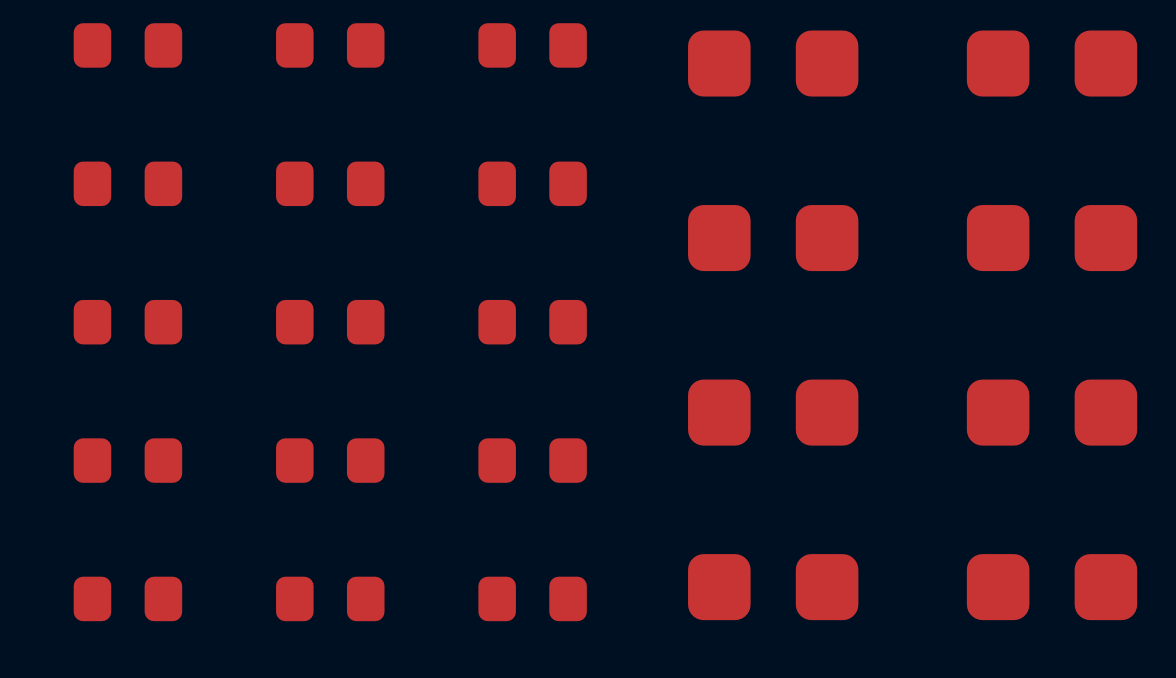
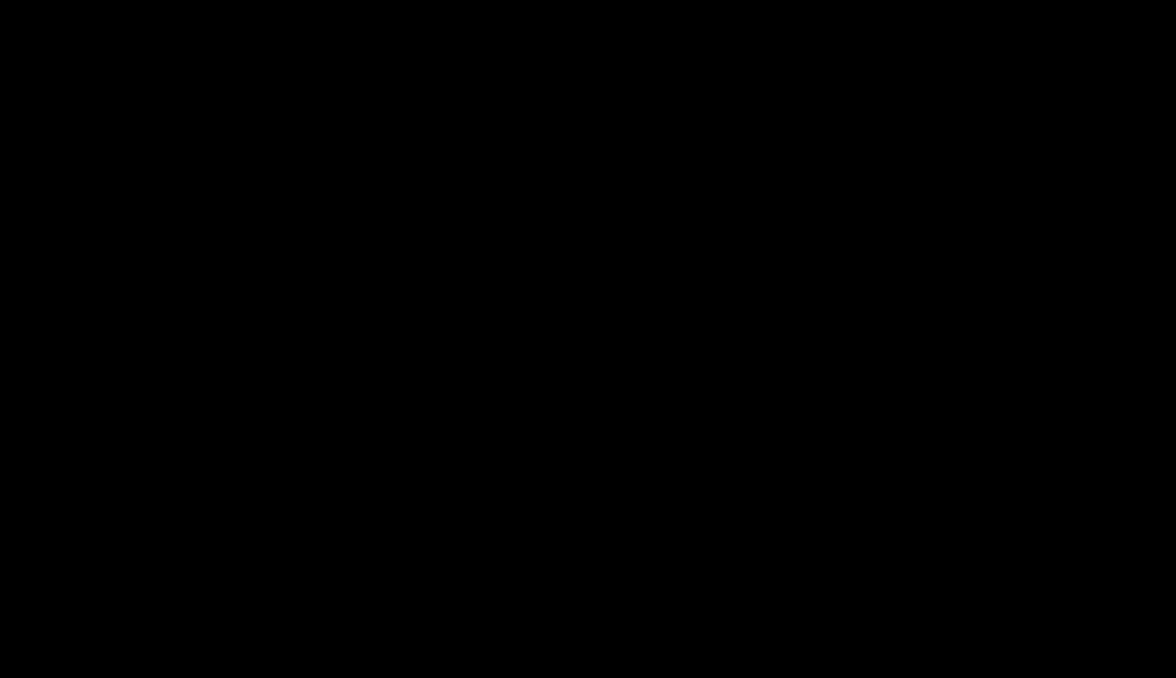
part: (127, 45) -> none
part: (330, 45) -> none
part: (532, 45) -> none
part: (773, 63) -> none
part: (1052, 63) -> none
part: (127, 183) -> none
part: (330, 183) -> none
part: (532, 183) -> none
part: (773, 238) -> none
part: (1052, 238) -> none
part: (127, 322) -> none
part: (330, 322) -> none
part: (532, 322) -> none
part: (773, 412) -> none
part: (1052, 412) -> none
part: (127, 460) -> none
part: (330, 460) -> none
part: (532, 460) -> none
part: (773, 587) -> none
part: (1052, 587) -> none
part: (127, 598) -> none
part: (330, 598) -> none
part: (532, 598) -> none

